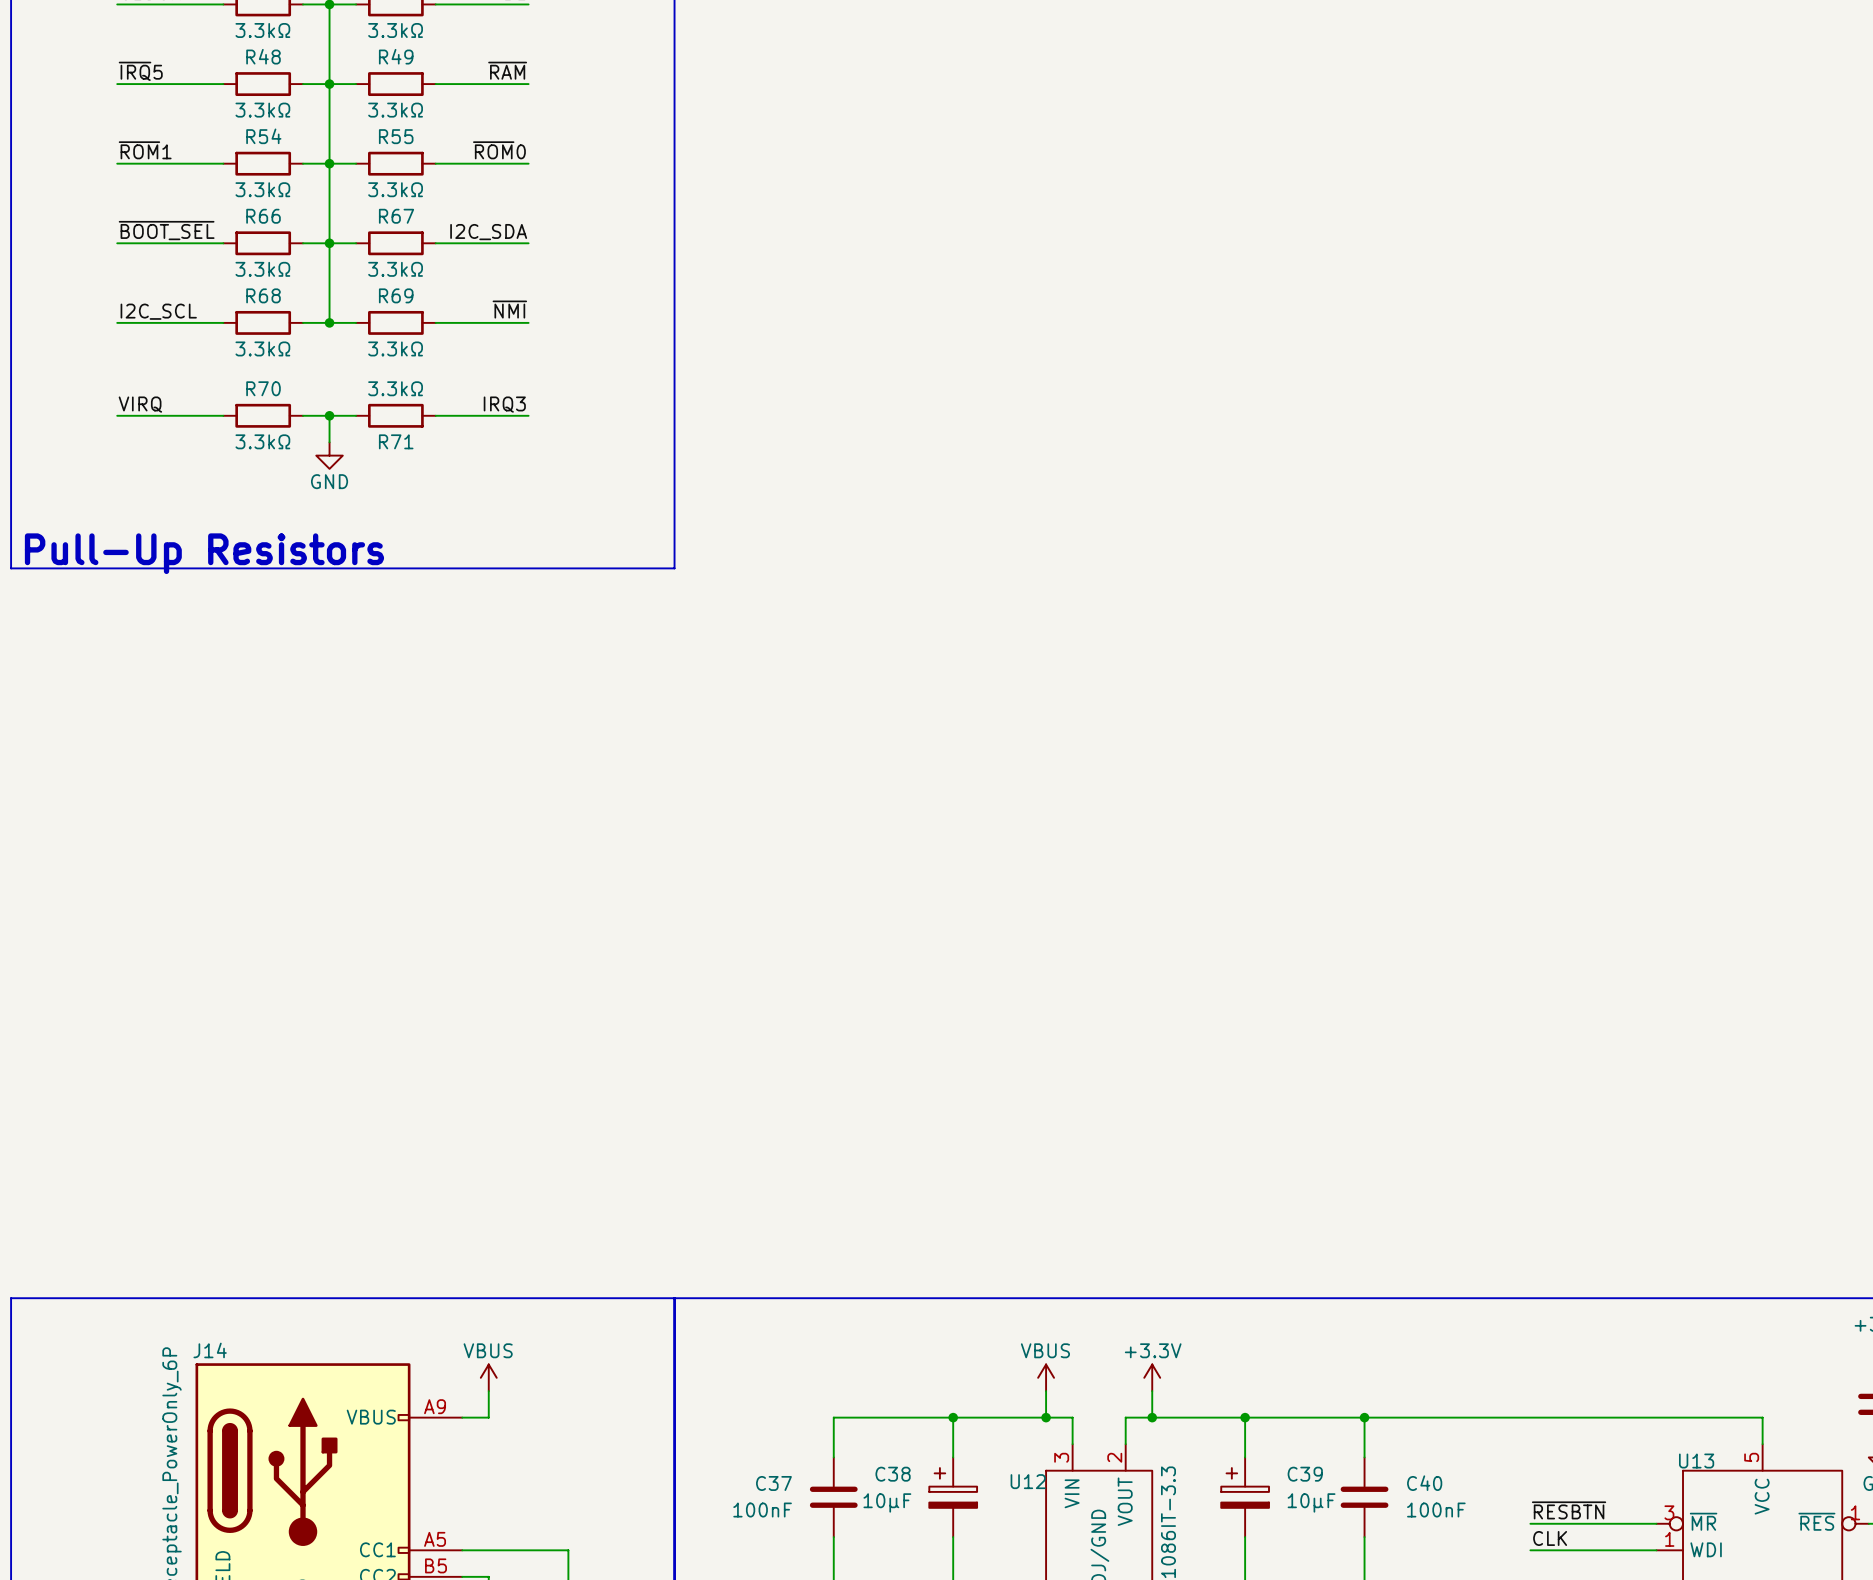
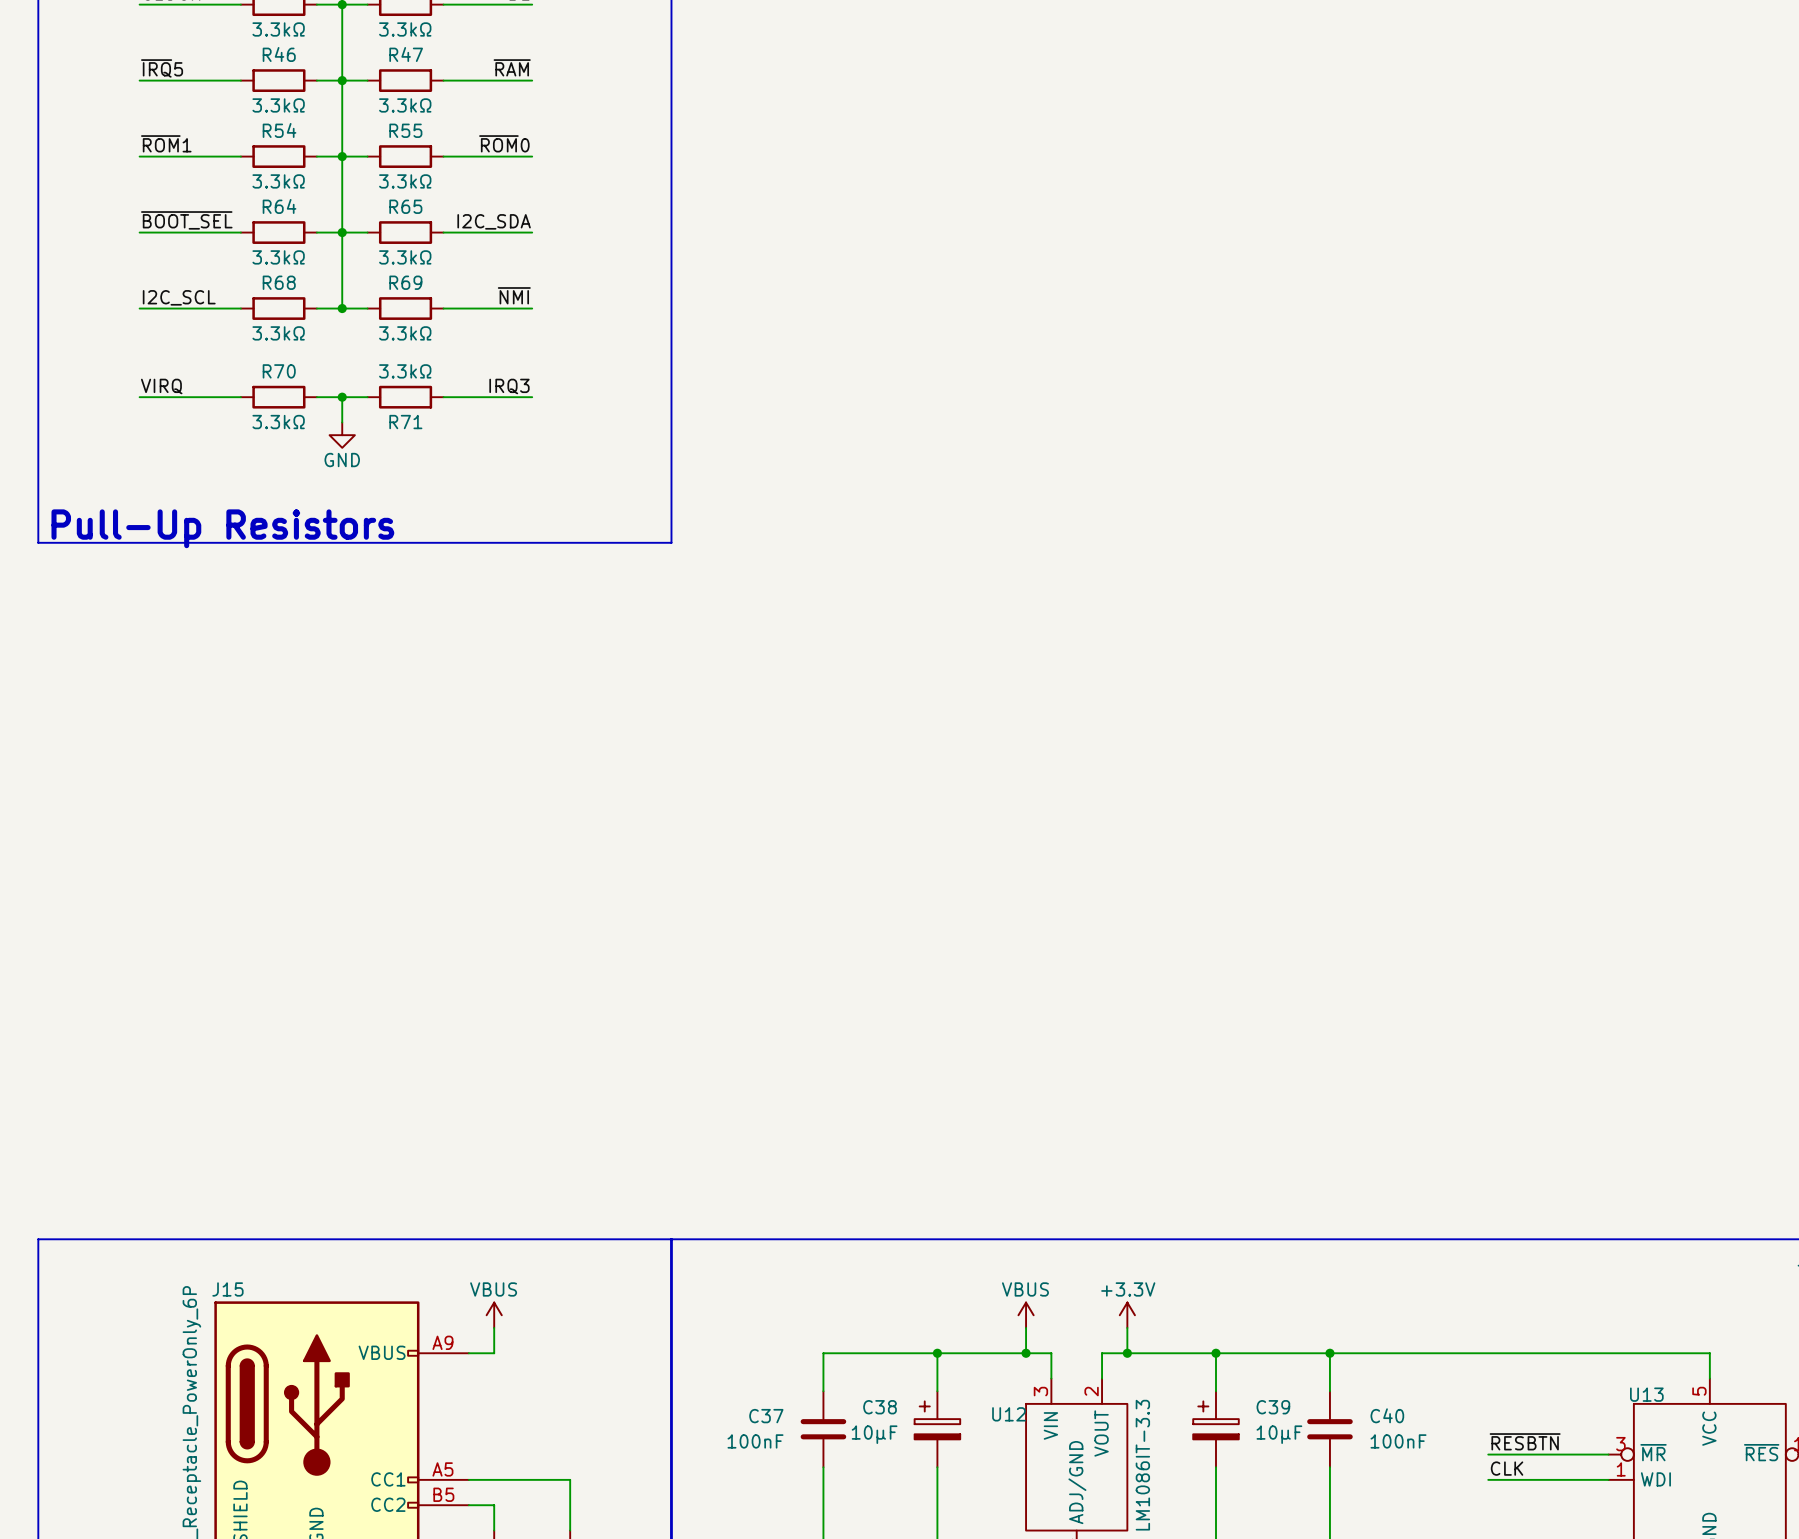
R48 name: R48 (263, 56) -> R46 (279, 54)
R49 name: R49 (396, 56) -> R47 (406, 54)
R66 name: R66 (263, 216) -> R64 (279, 206)
R67 name: R67 (396, 216) -> R65 (405, 206)
J14 name: J14 (210, 1350) -> J15 (227, 1289)

